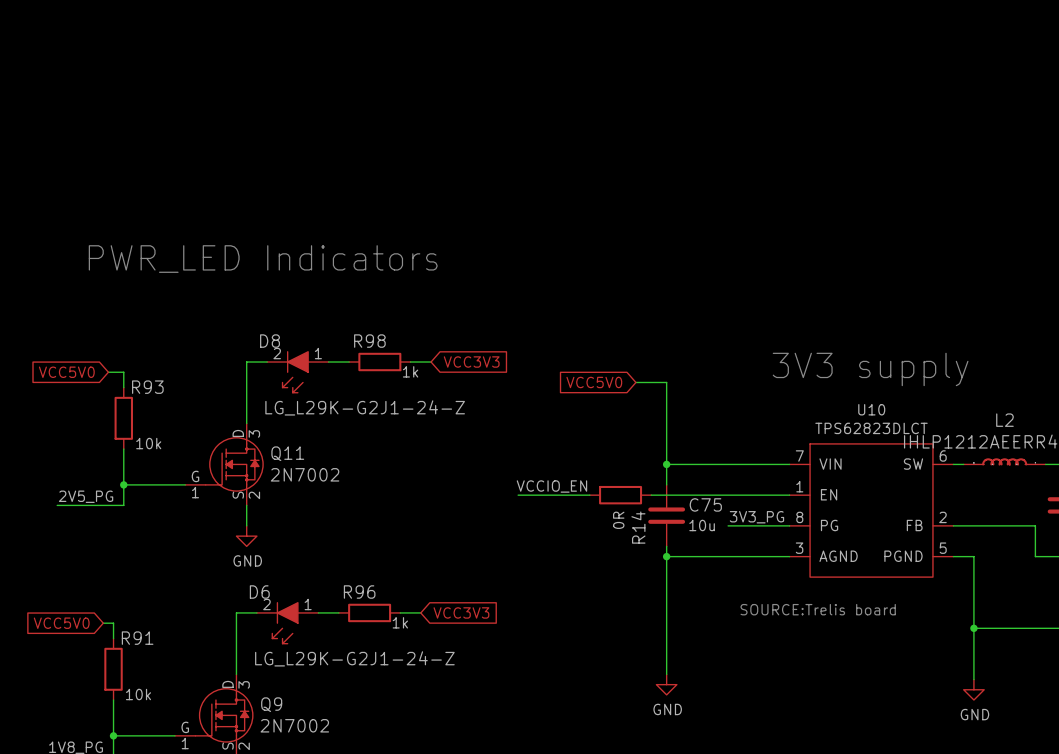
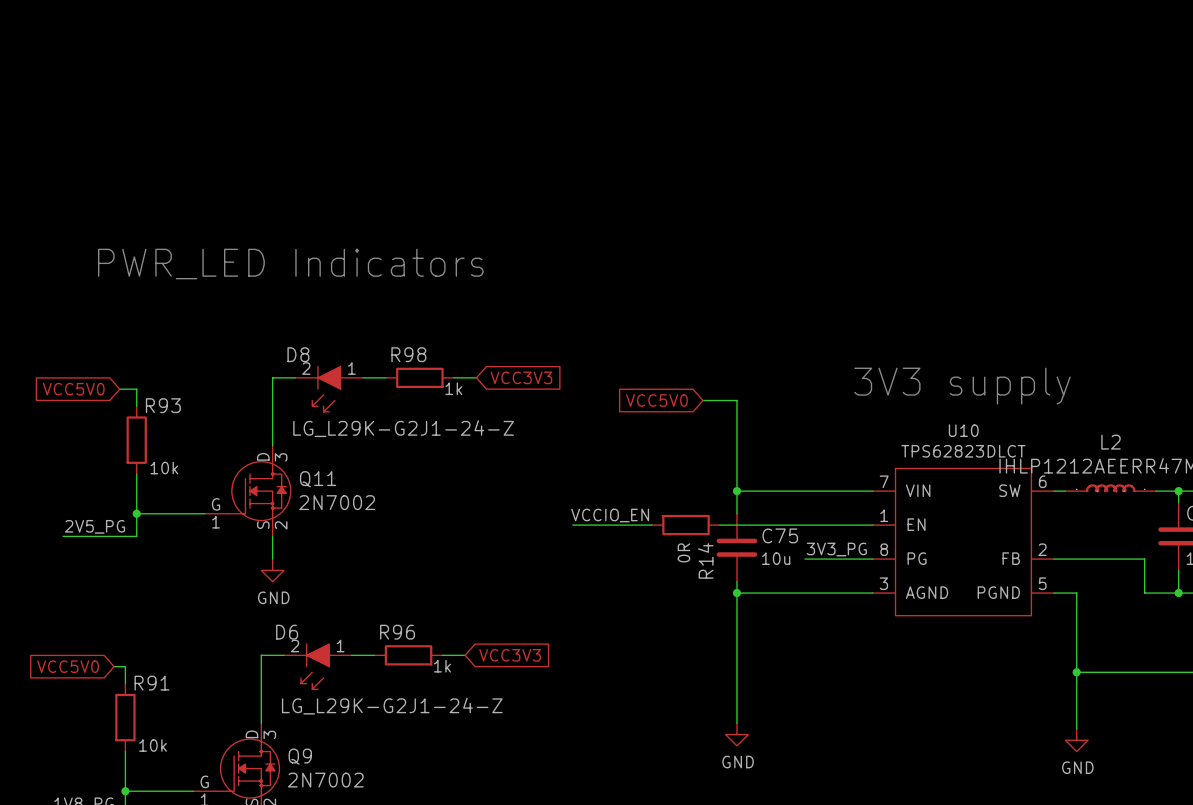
text: SOURCE:Trelis board (818, 609) -> none

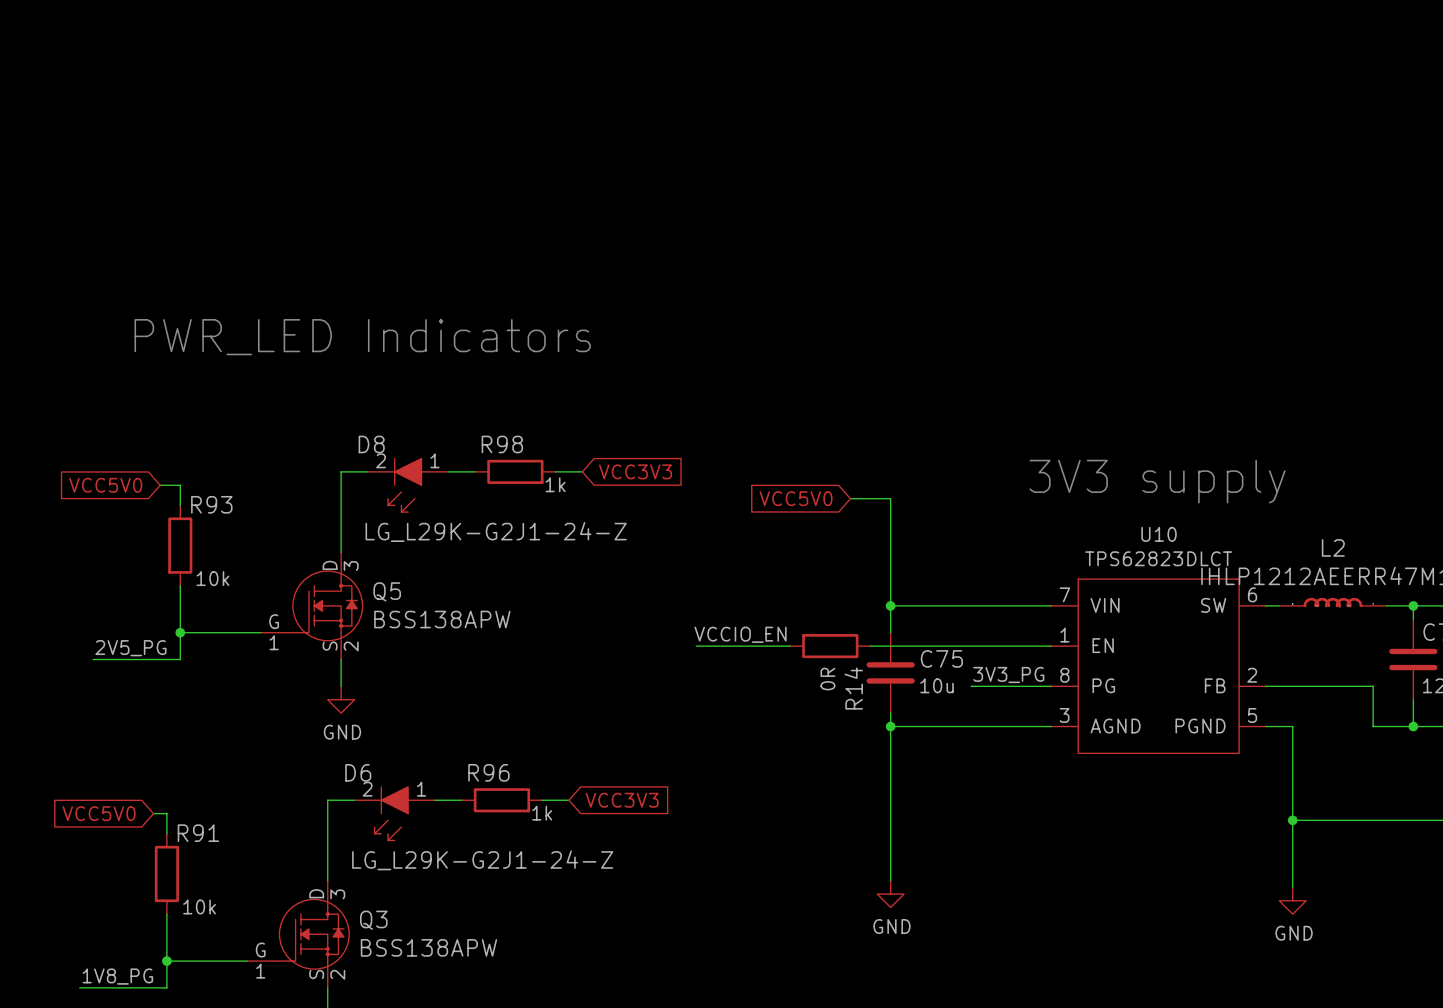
Q11 name: Q11 (318, 479) -> Q5 (387, 591)
Q11 value: 2N7002 (337, 502) -> BSS138APW (442, 619)
Q9 name: Q9 (300, 756) -> Q3 (373, 920)
Q9 value: 2N7002 (325, 780) -> BSS138APW (428, 947)

